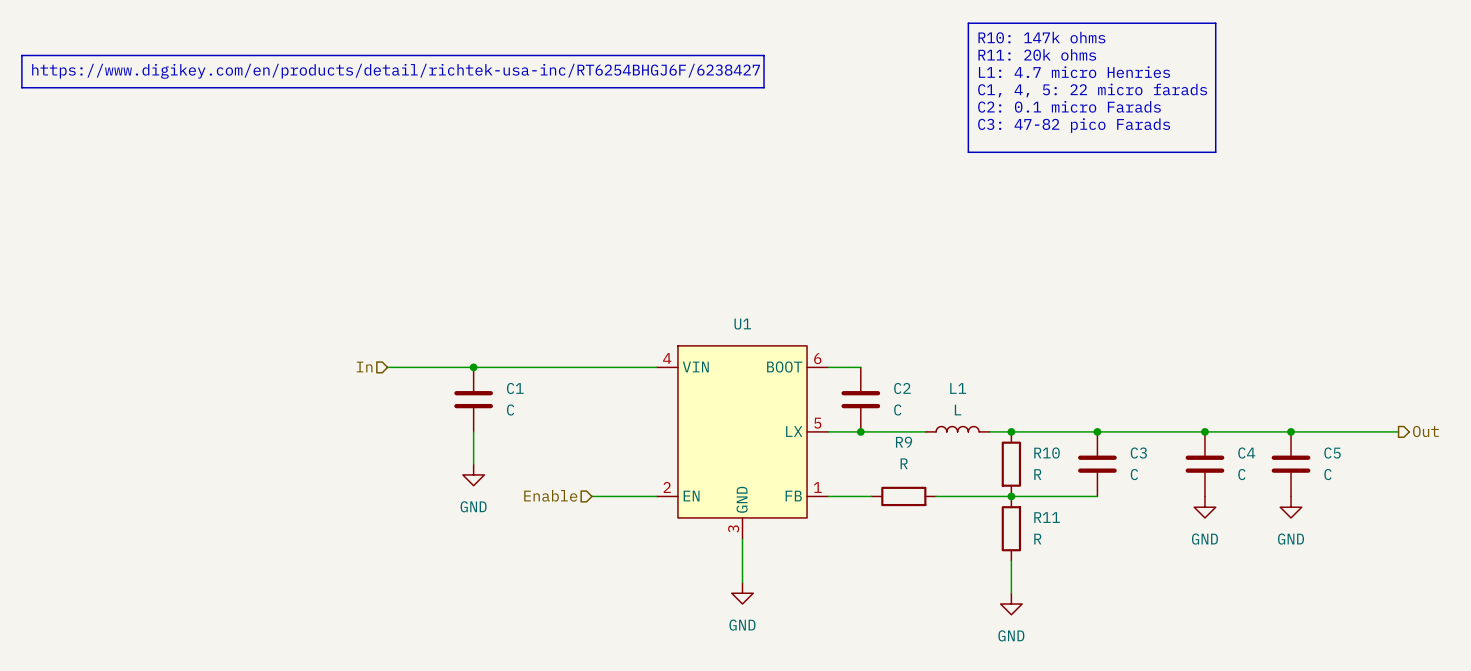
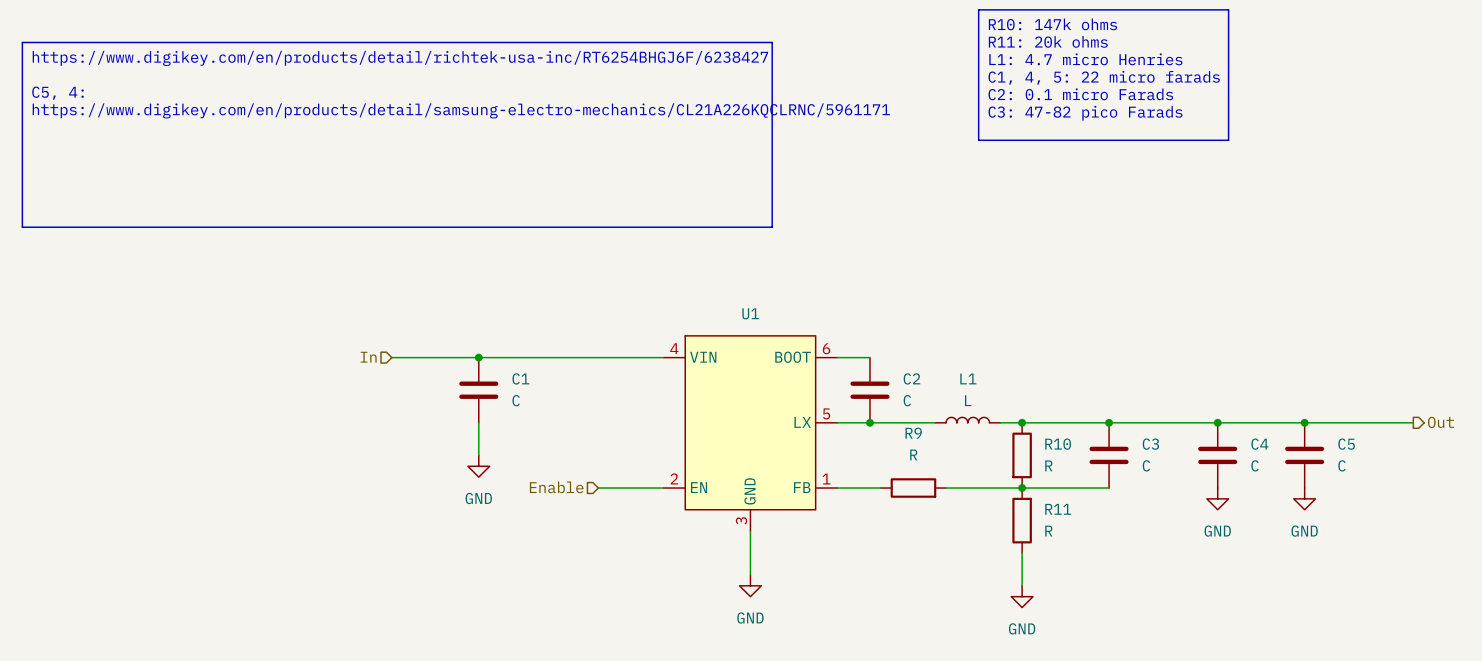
line: (21, 87) (764, 87) -> (22, 75) (22, 227) (772, 227) (772, 75)
text: none -> C5, 4: (57, 93)
text: none -> https://www.digikey.com/en/products/detail/samsung-electro-mechanics/CL21A226KQCLRNC/5961171 (461, 110)

